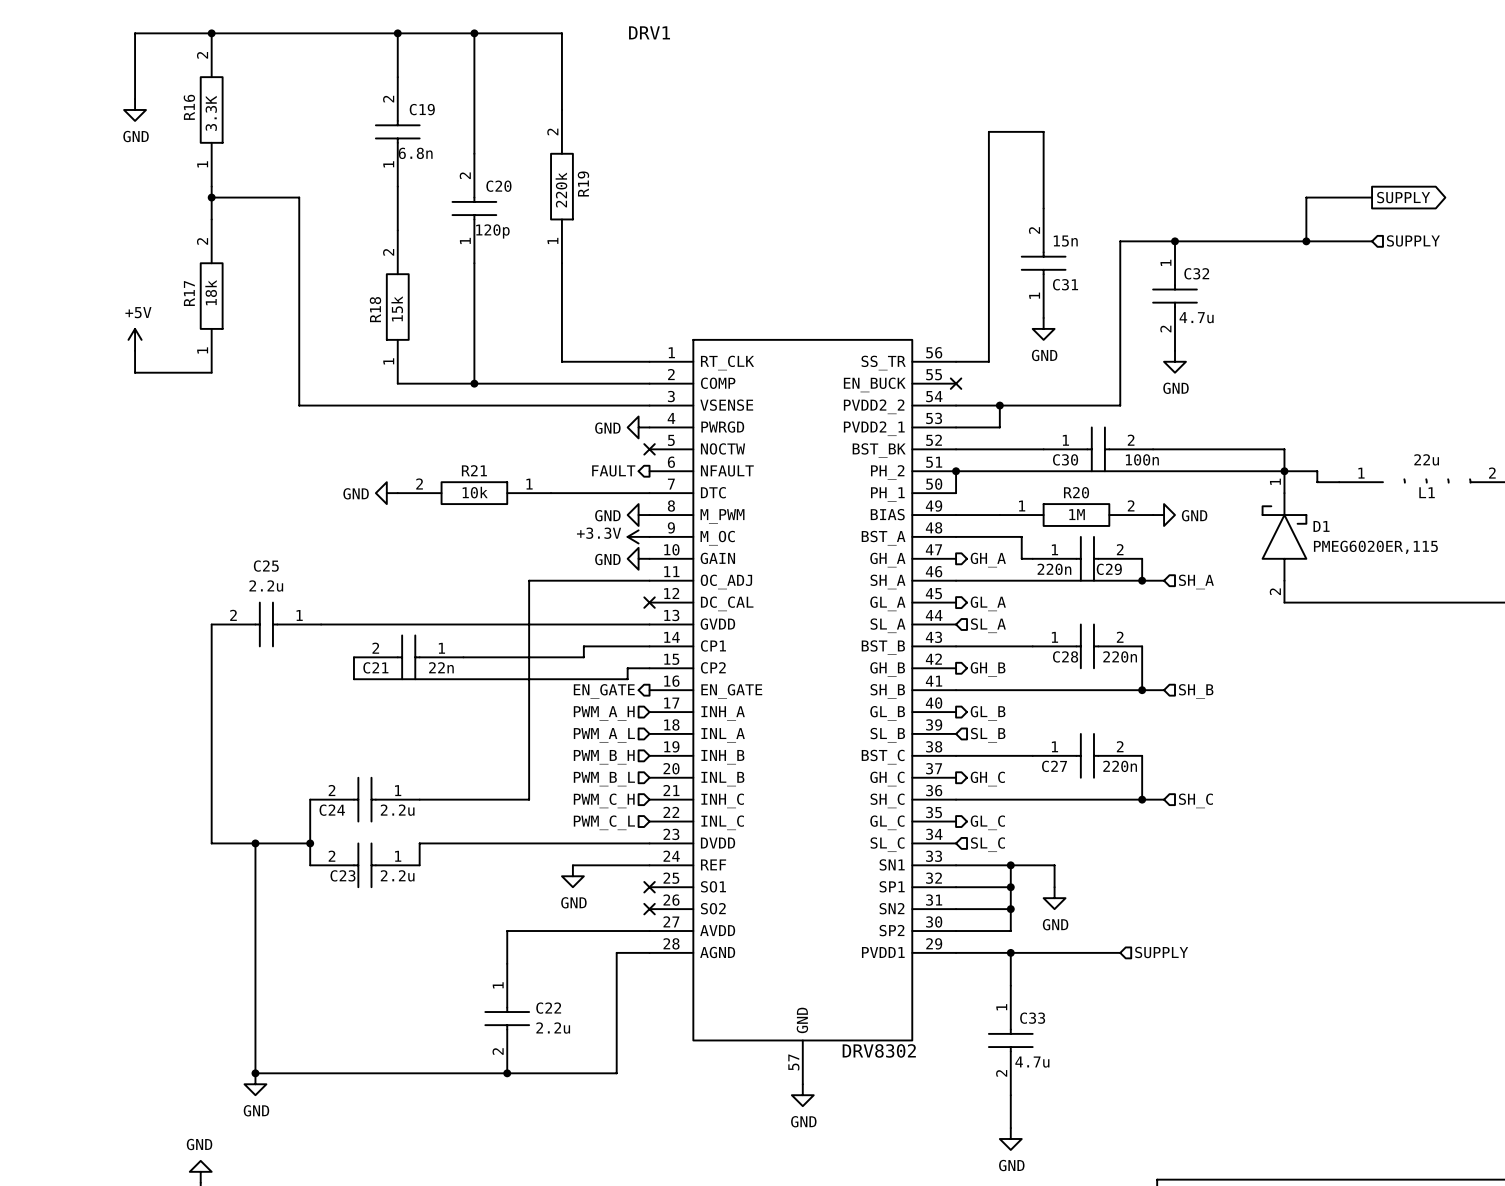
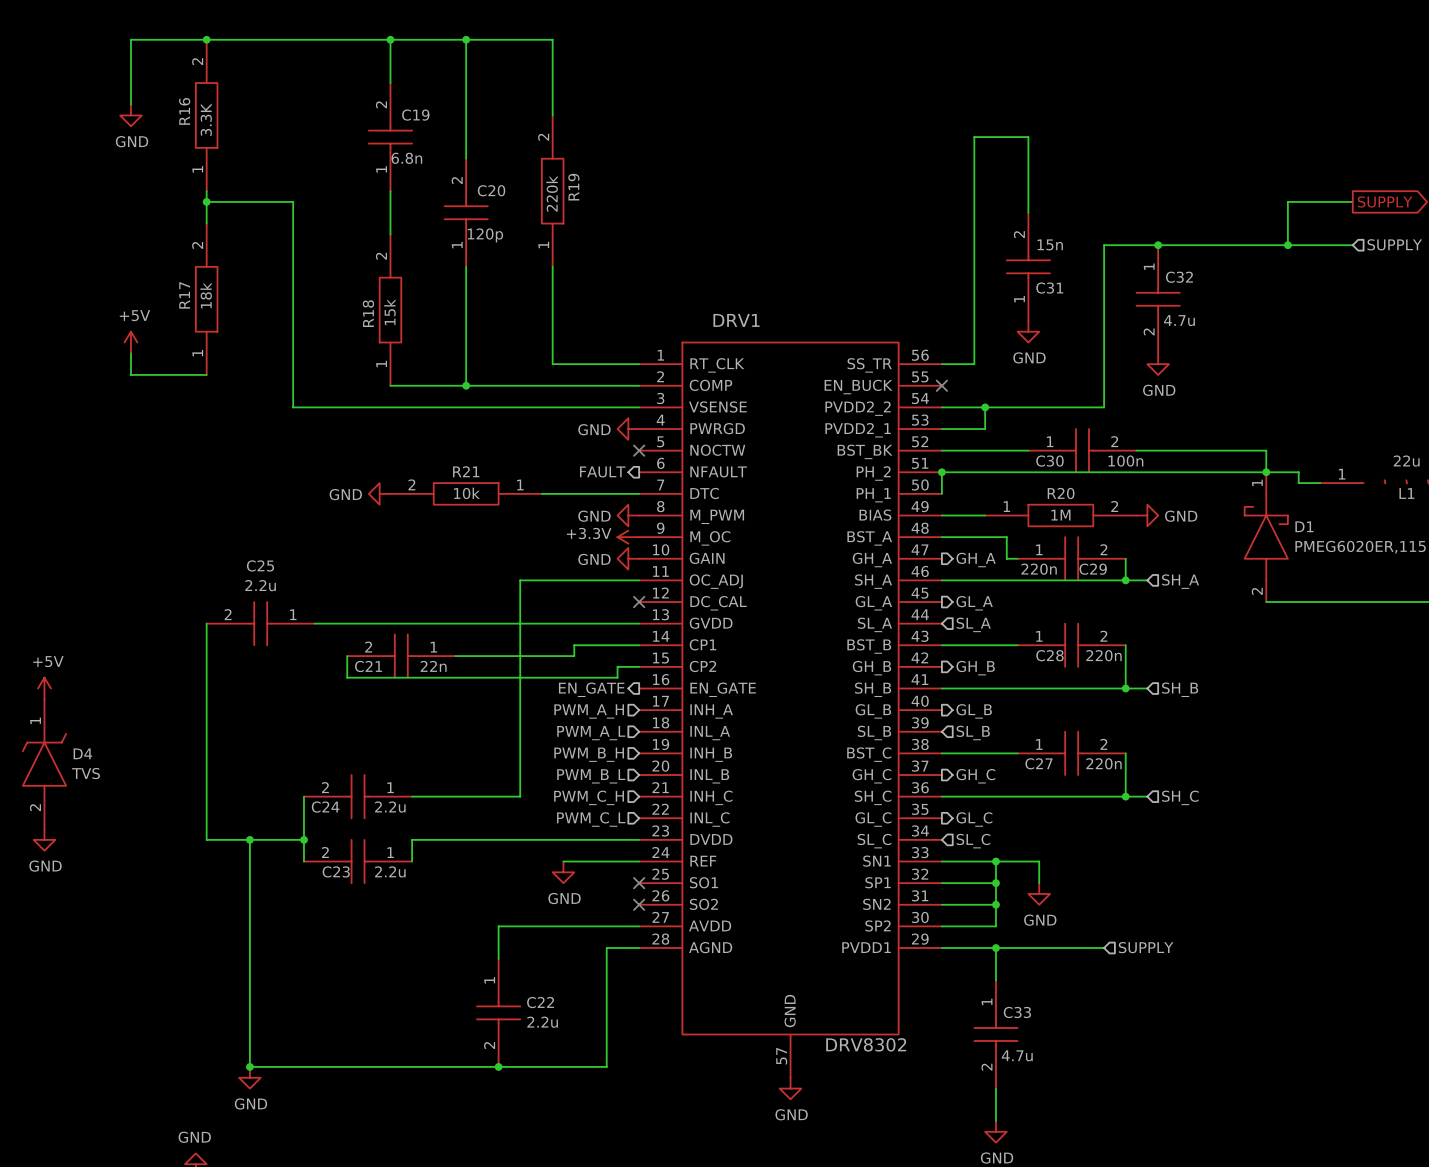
DRV1 name position: DRV1 (649, 32) -> DRV1 (736, 320)
power symbol: none -> +5V (44, 688)
D4: none -> TVS (44, 764)
power symbol: none -> GND (44, 839)

